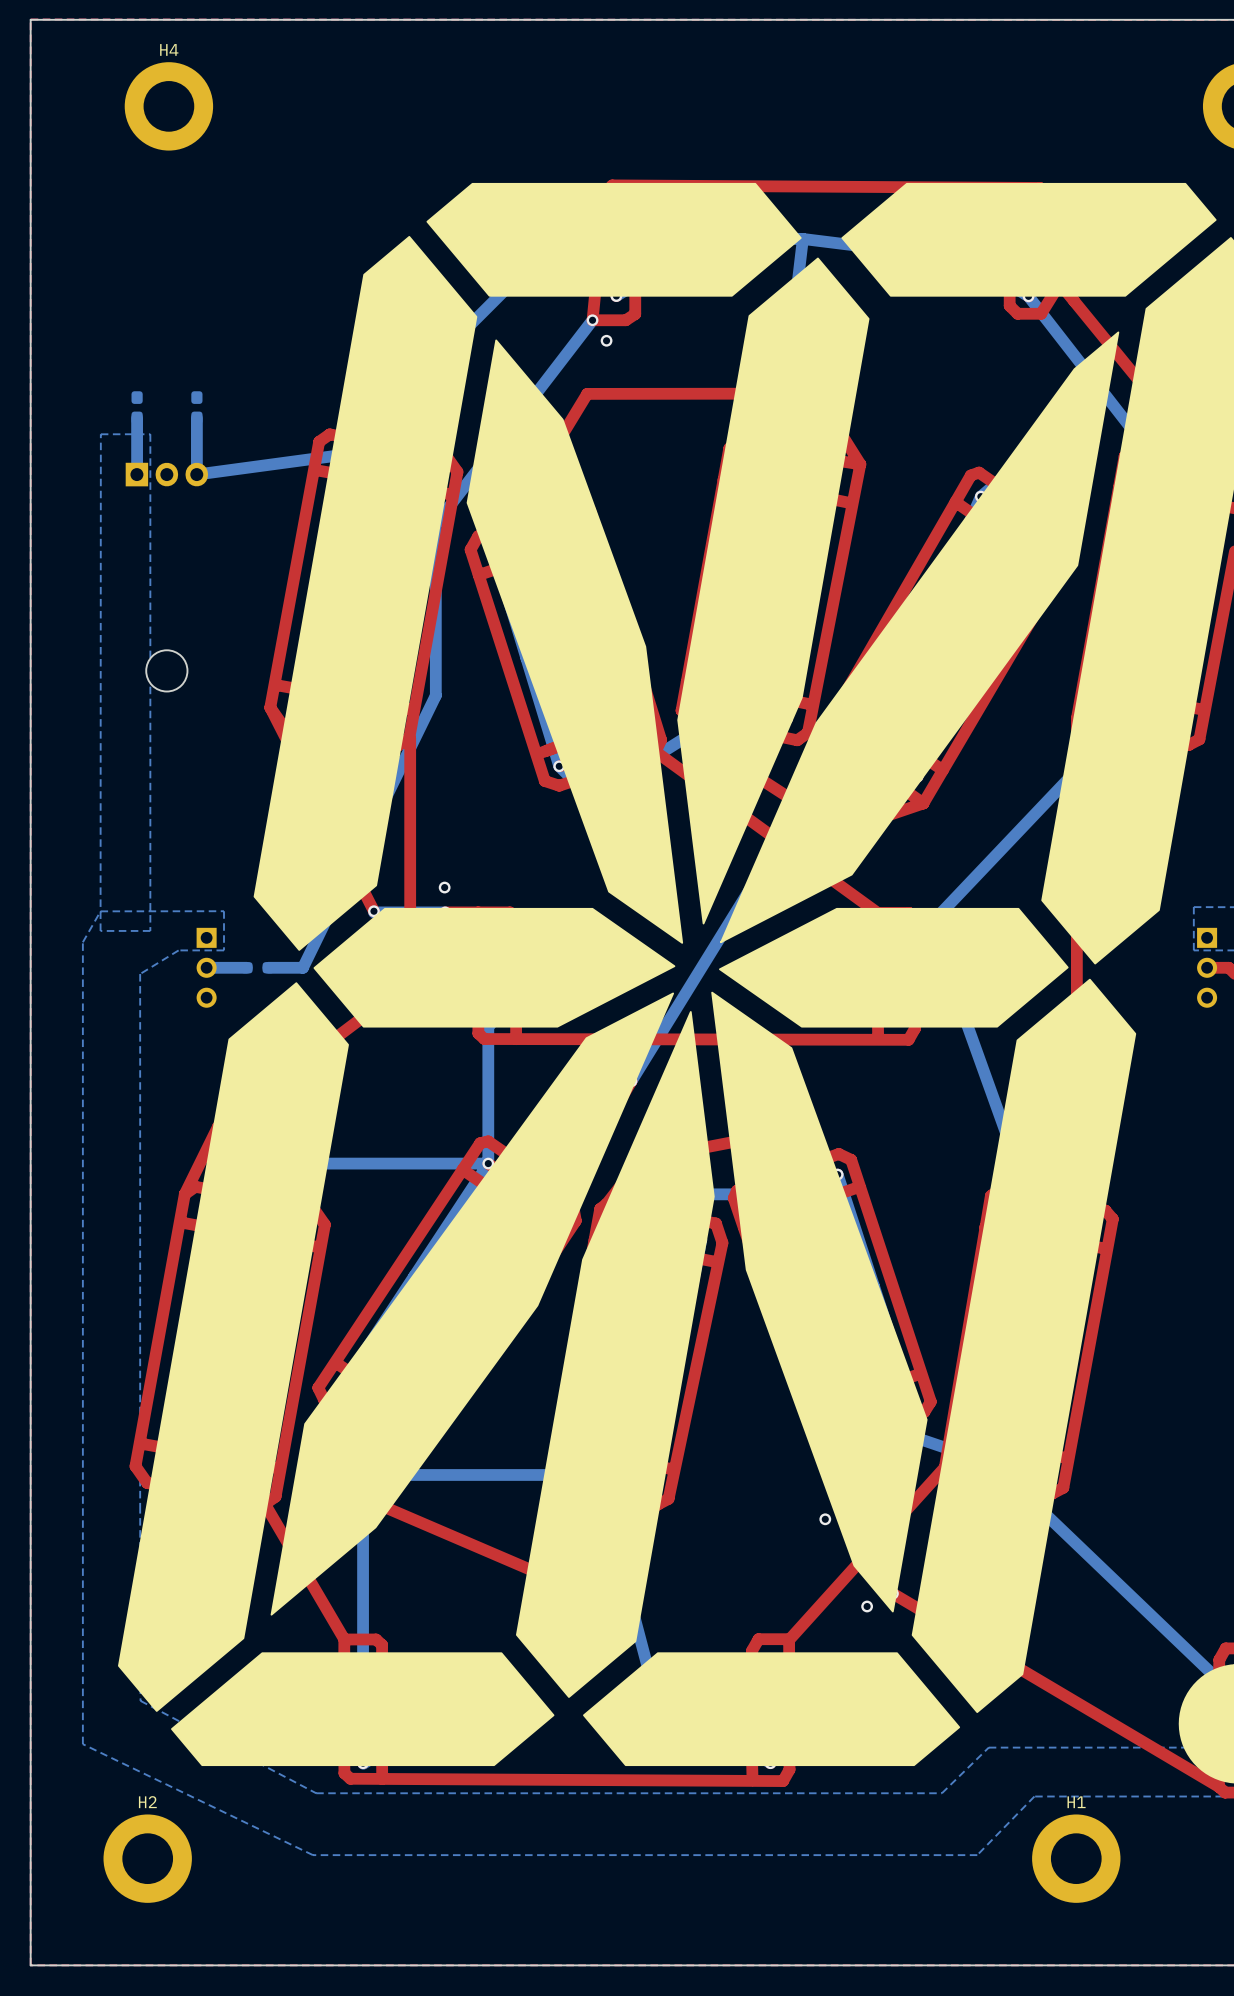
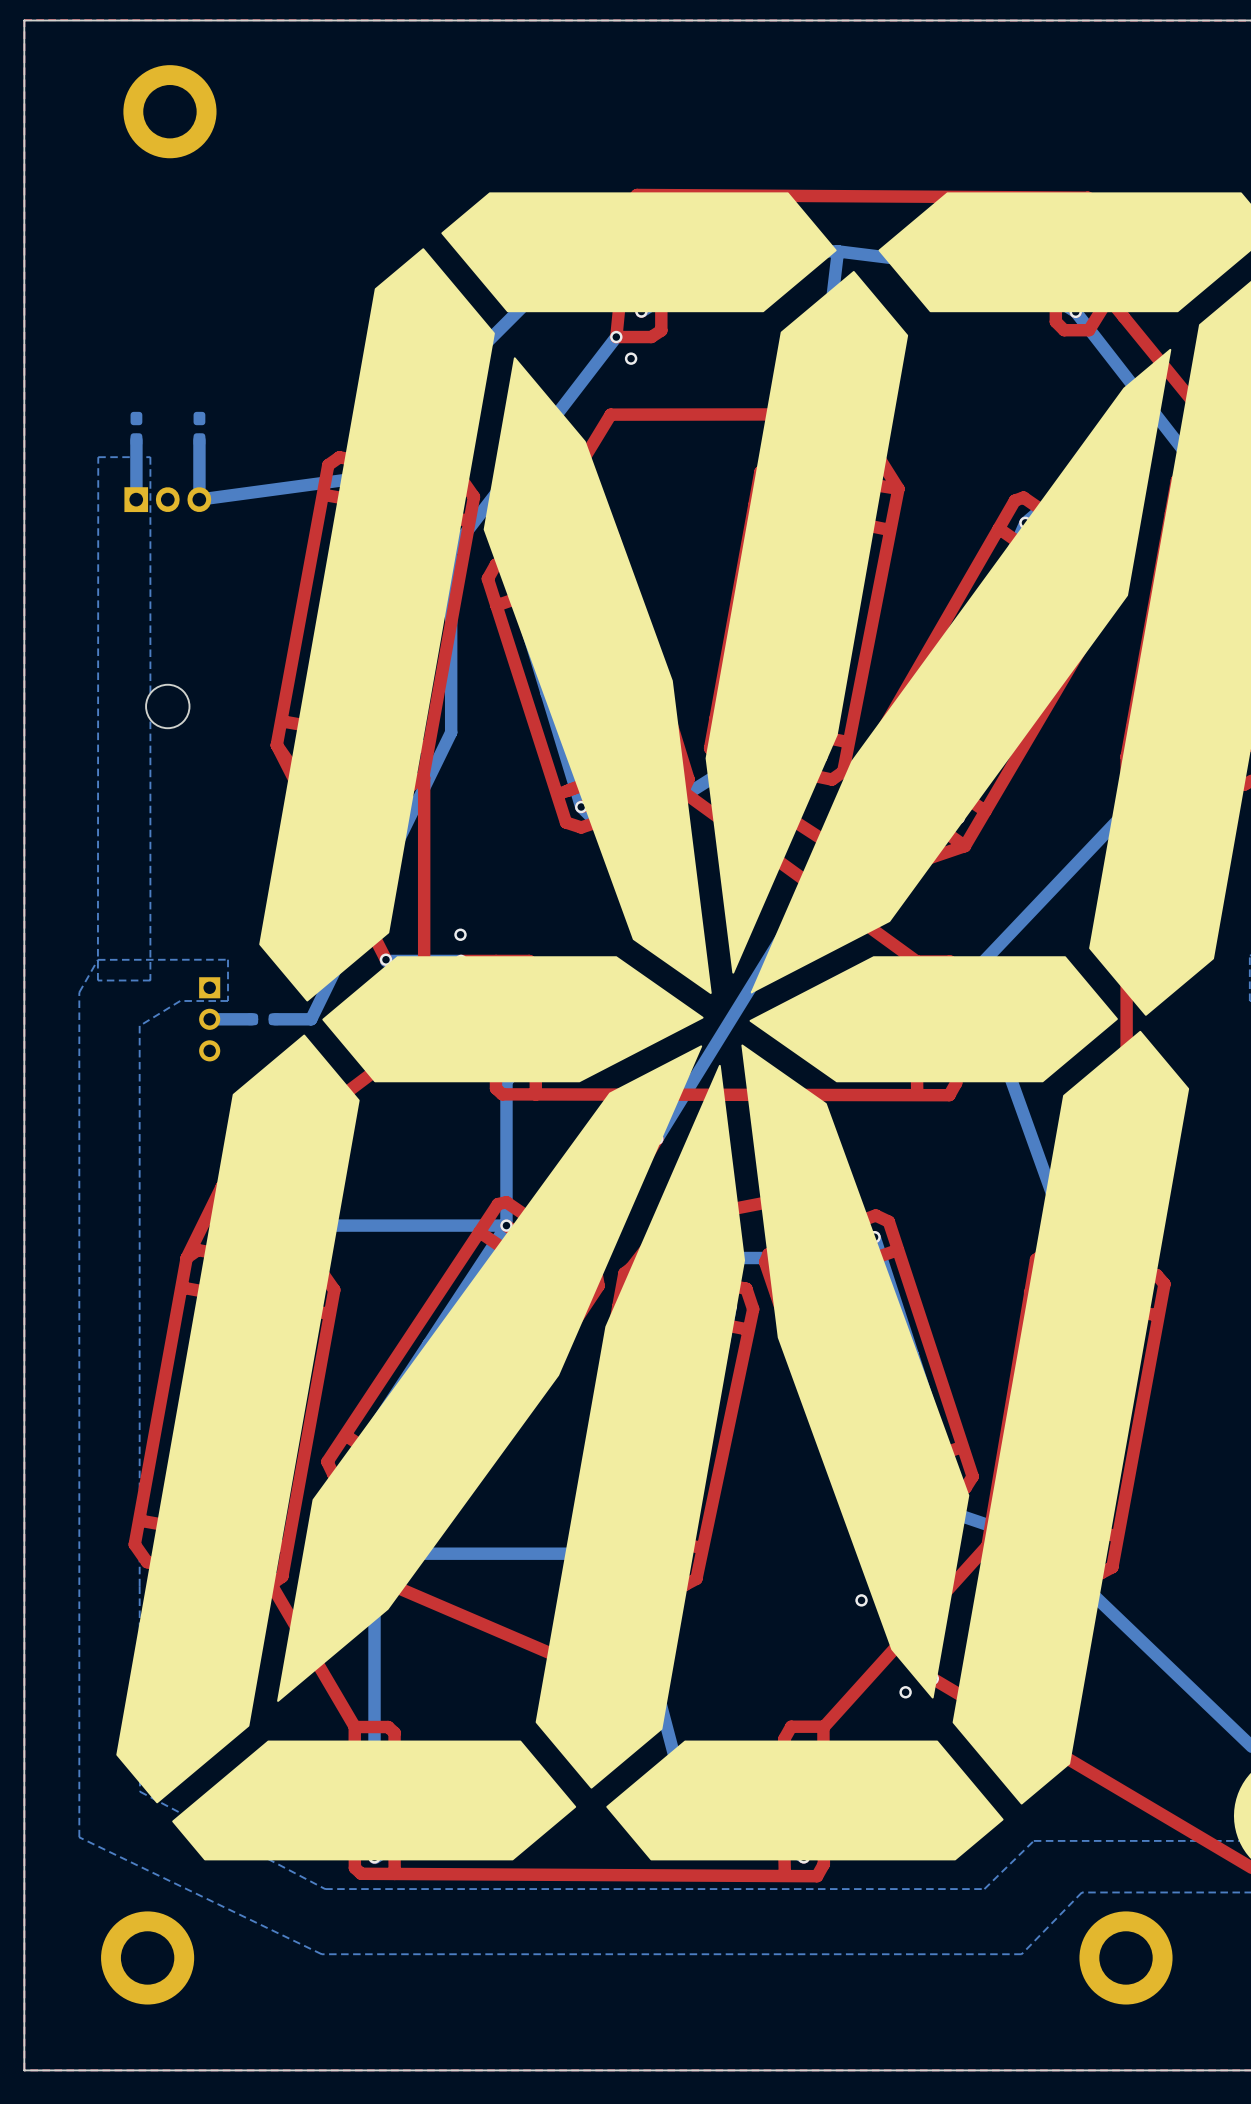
H4 name: H4 (169, 49) -> none
H2 name: H2 (147, 1802) -> none
H1 name: H1 (1076, 1802) -> none

